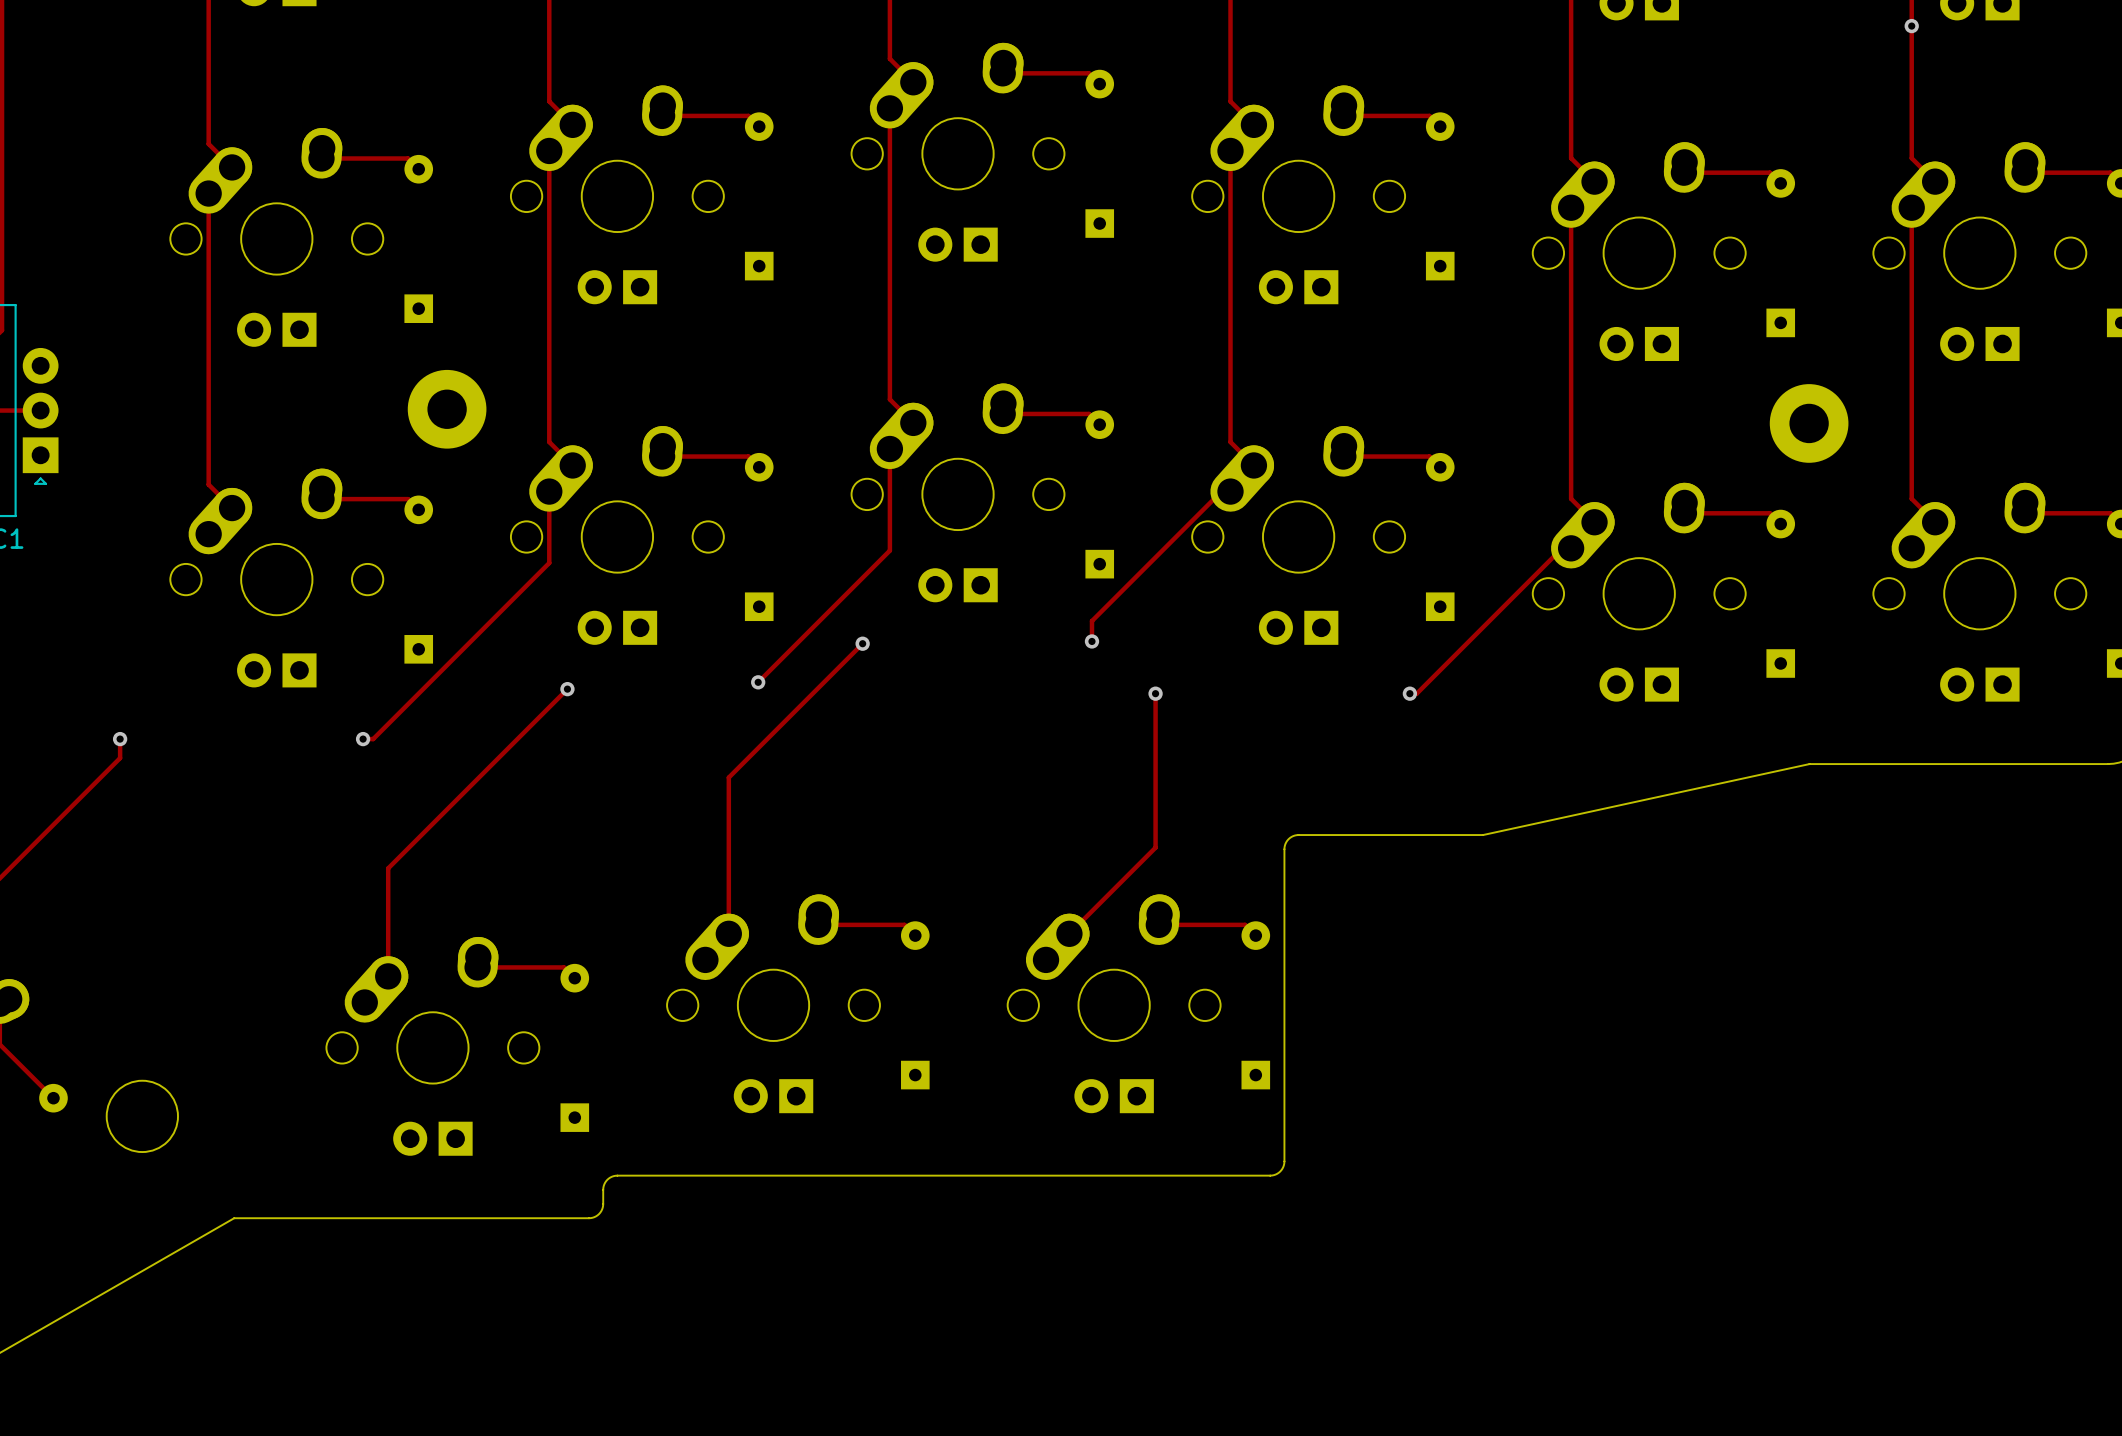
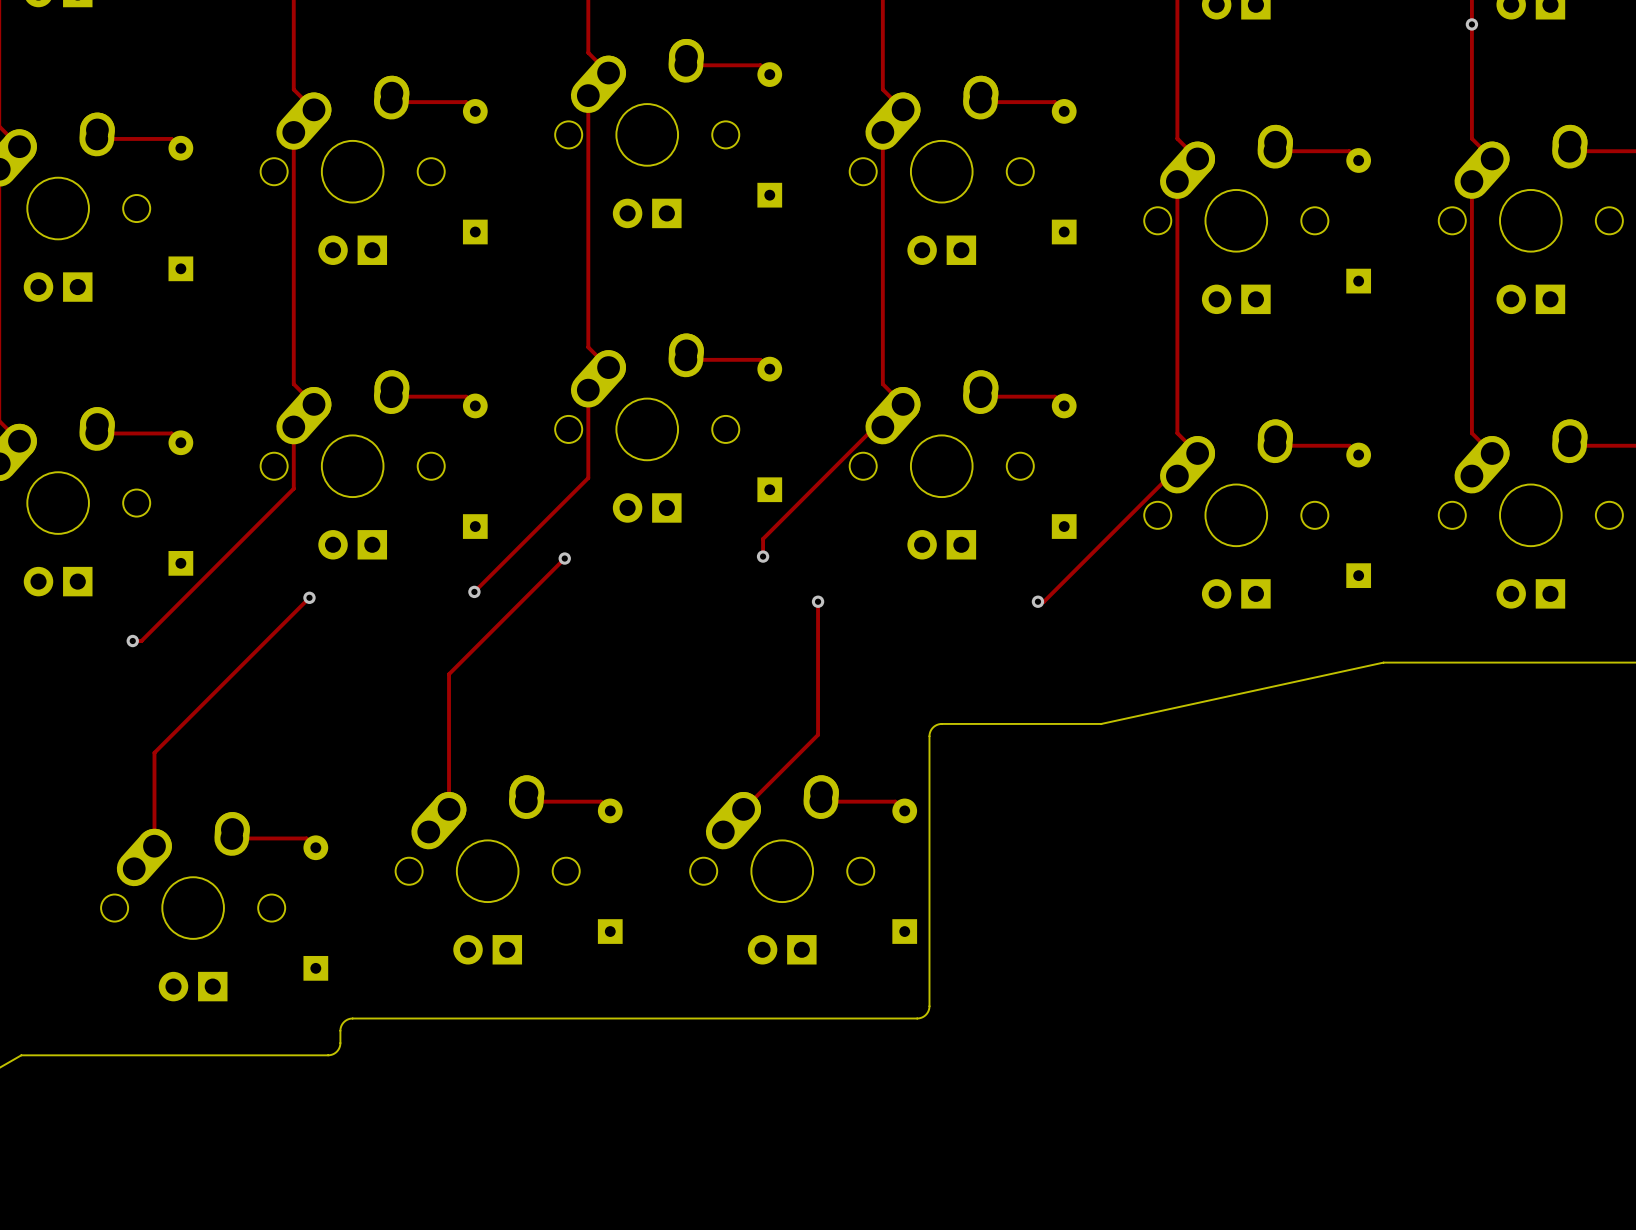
part: (447, 409) -> none
part: (1809, 423) -> none

